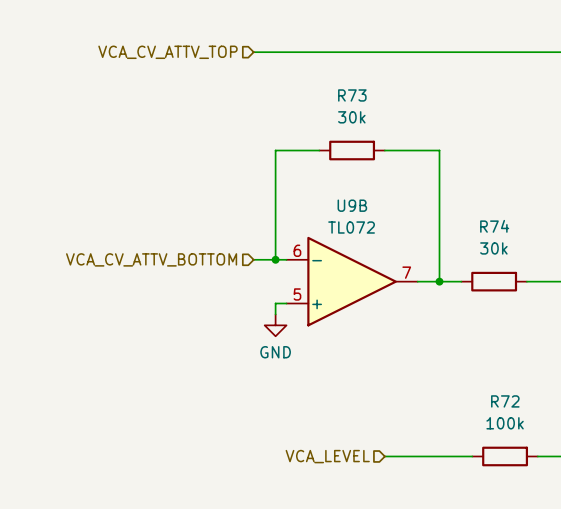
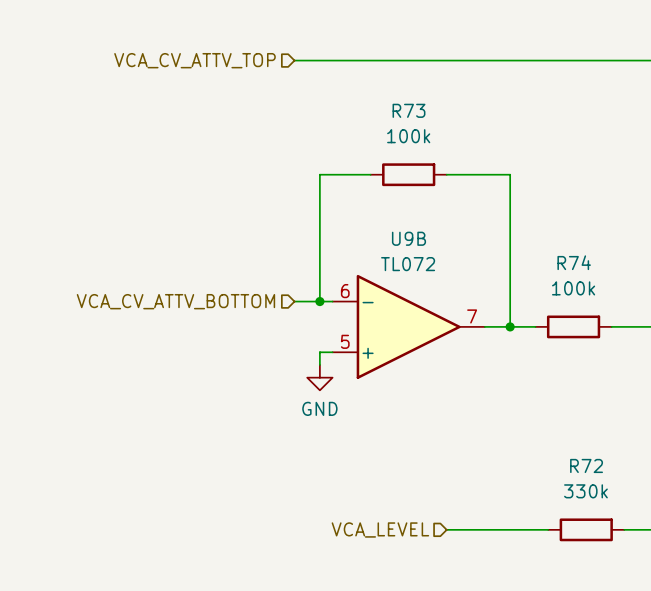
R73 value: 30k (351, 117) -> 100k (408, 136)
R74 value: 30k (493, 248) -> 100k (573, 288)
R72 value: 100k (505, 423) -> 330k (585, 491)

